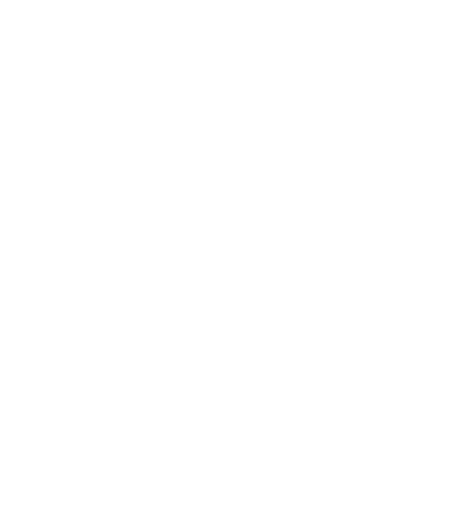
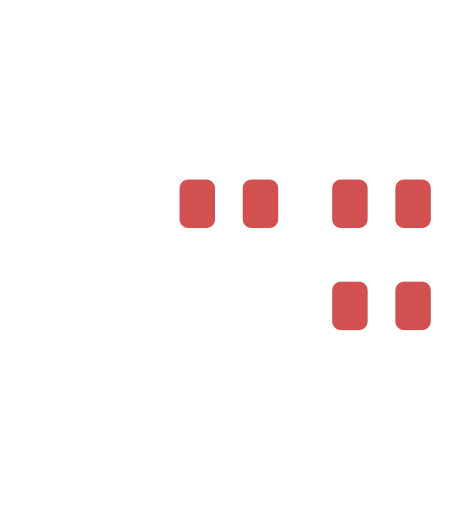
part: none -> (228, 203)
part: none -> (381, 203)
part: none -> (381, 305)

